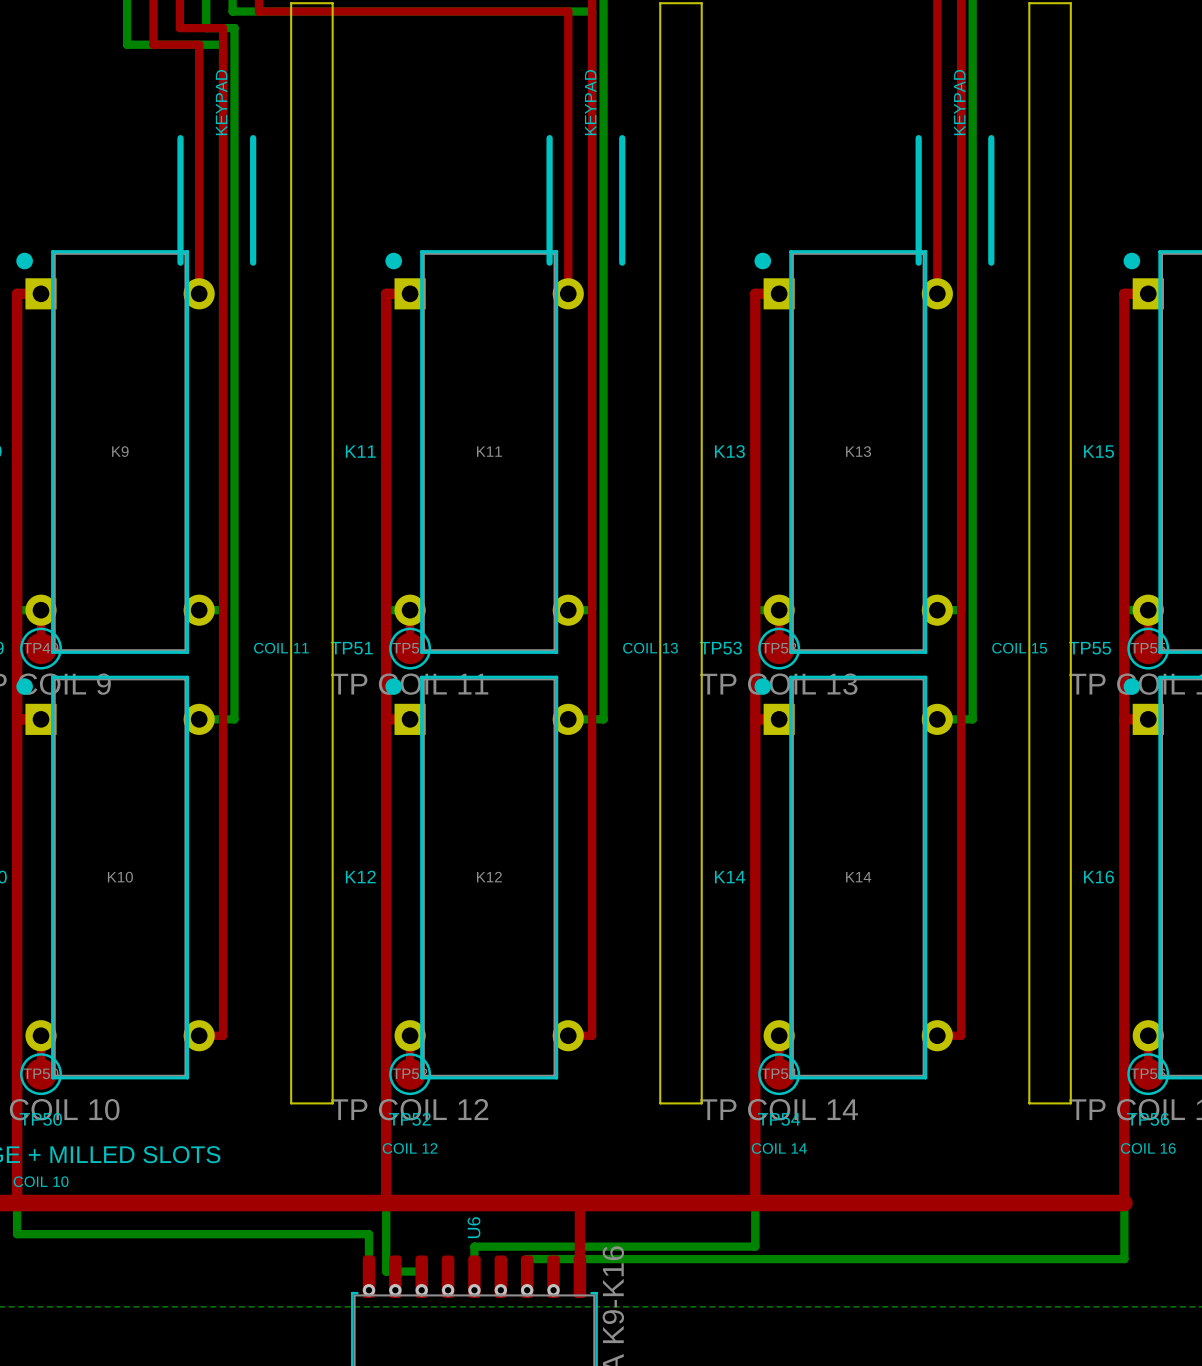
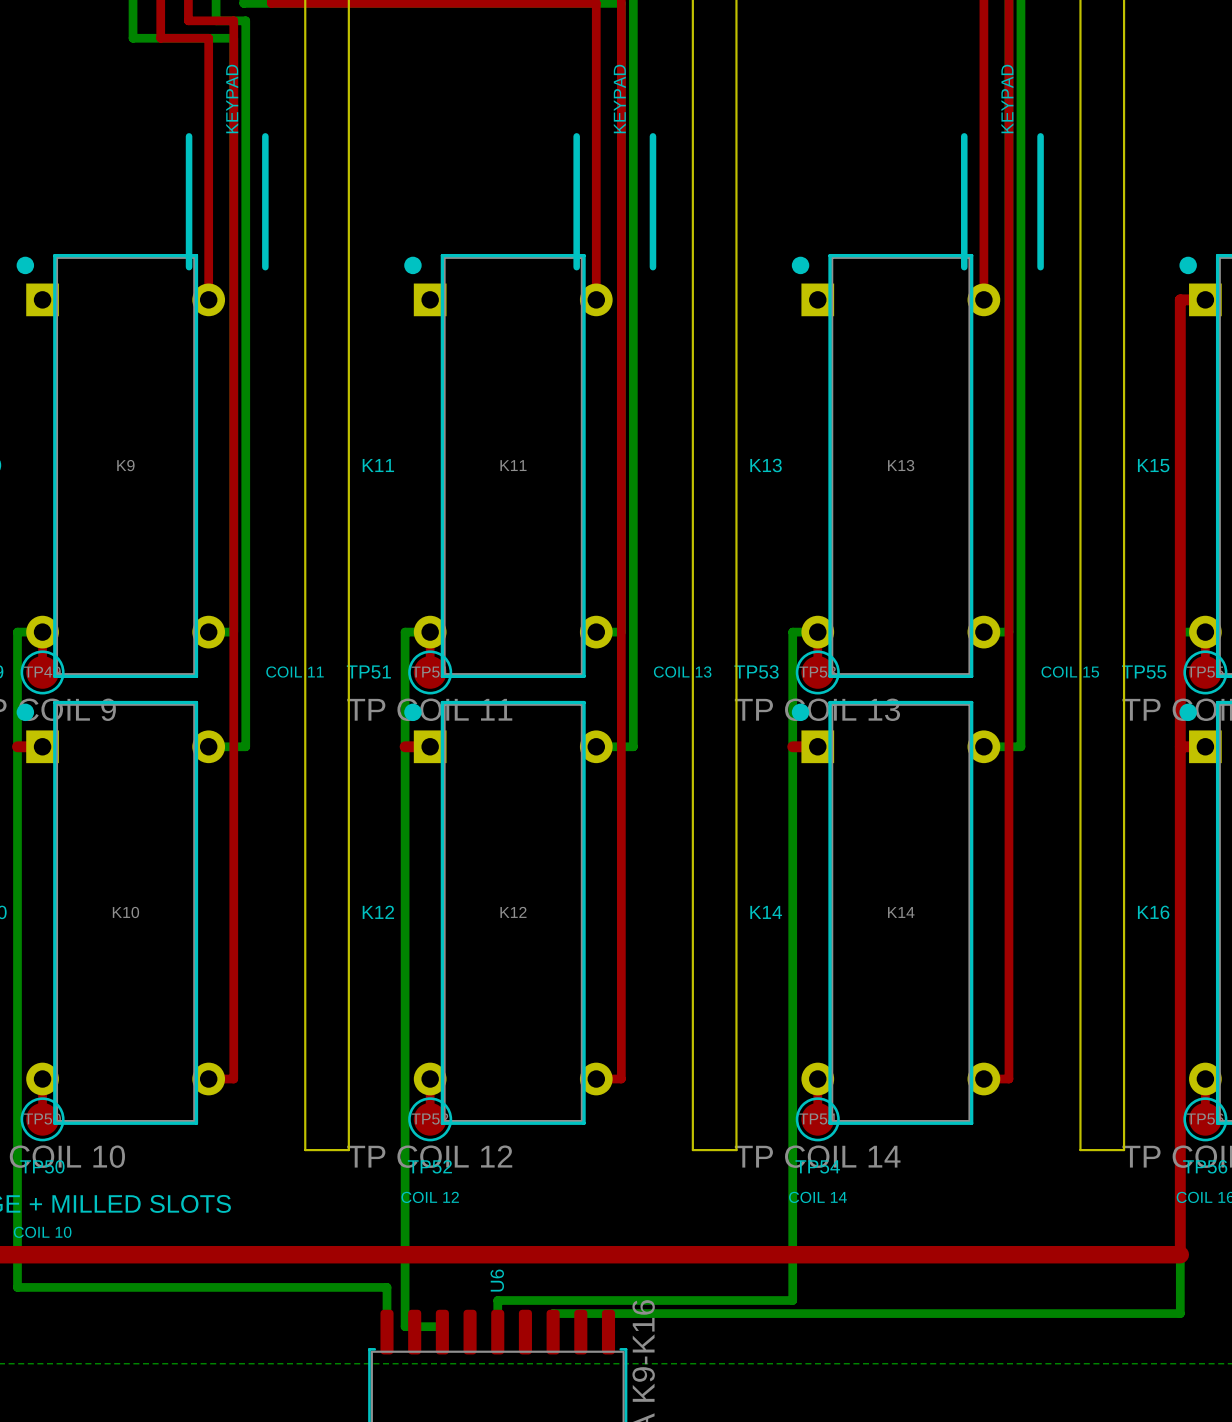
top track: (41, 293) (17, 293) (17, 1203) -> none
top track: (410, 293) (386, 293) (386, 1203) -> none
top track: (779, 293) (755, 293) (755, 1203) -> none
top track: (579, 1203) (579, 1276) -> none
via: (368, 1290) -> none
via: (395, 1290) -> none
via: (421, 1290) -> none
via: (448, 1290) -> none
via: (474, 1290) -> none
via: (500, 1290) -> none
via: (527, 1290) -> none
via: (553, 1290) -> none

